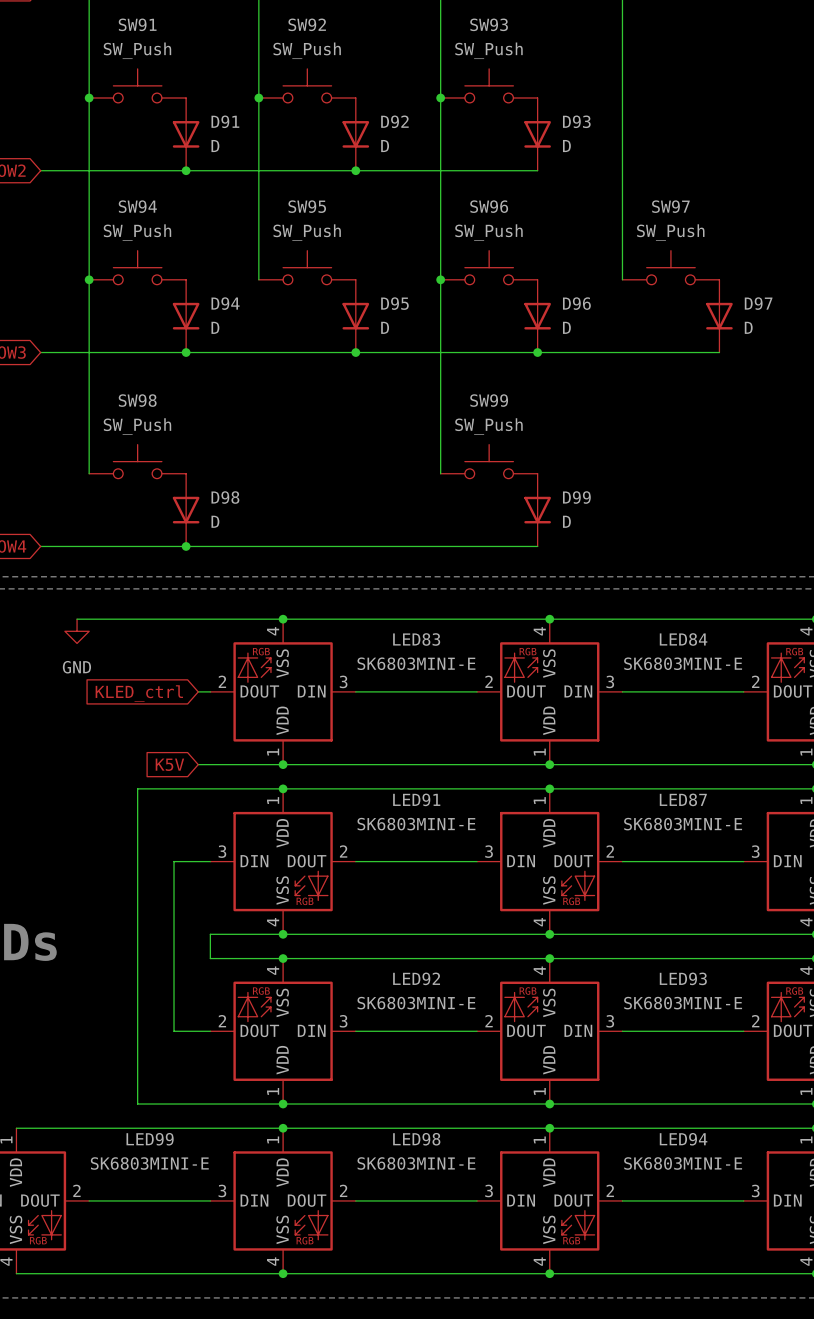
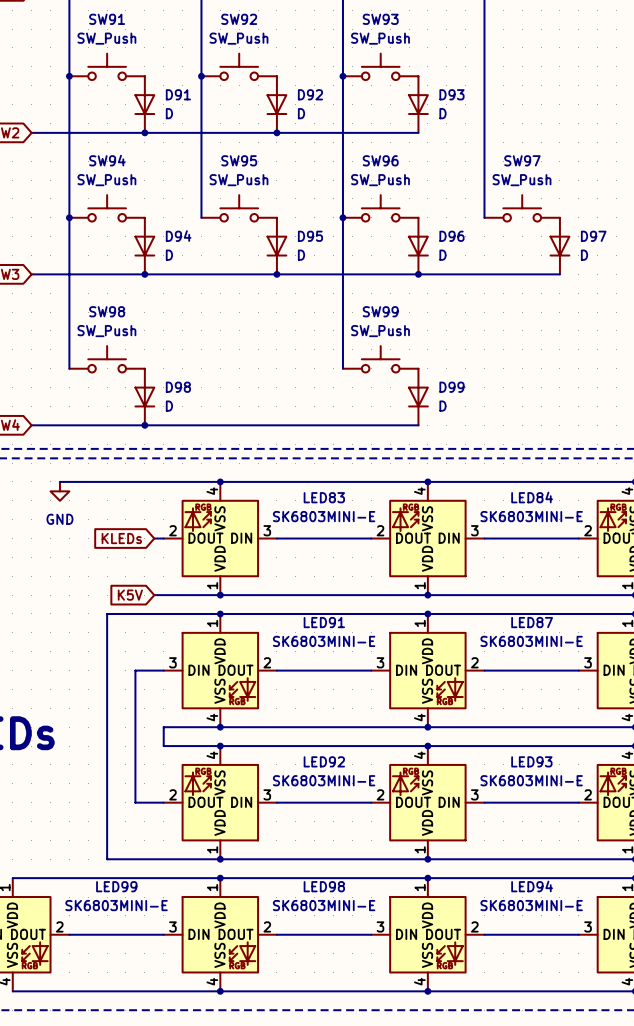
global label: KLED_ctrl (139, 693) -> KLEDs (121, 538)

